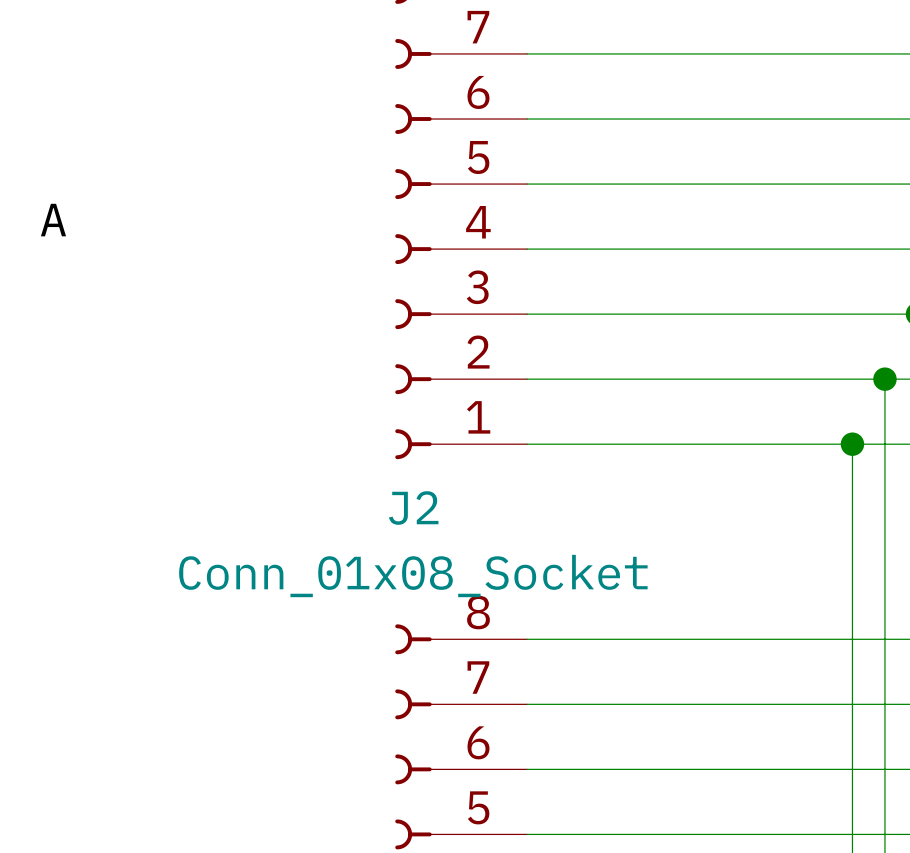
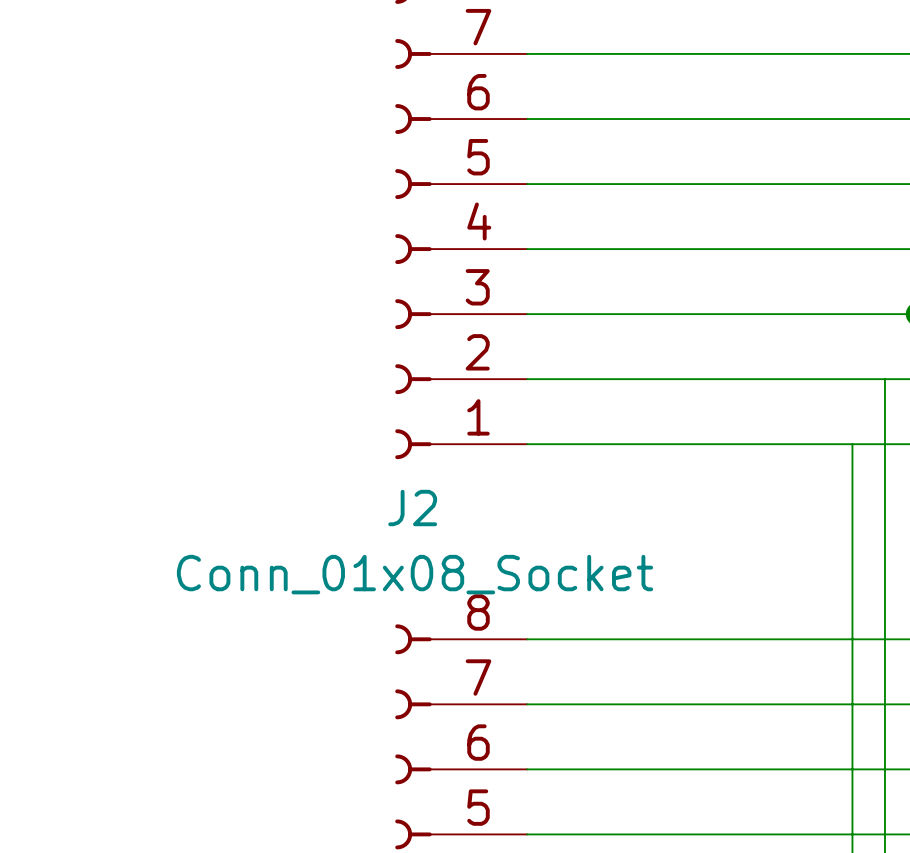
label: A (53, 220) -> none
junction: (884, 379) -> none
junction: (852, 444) -> none

